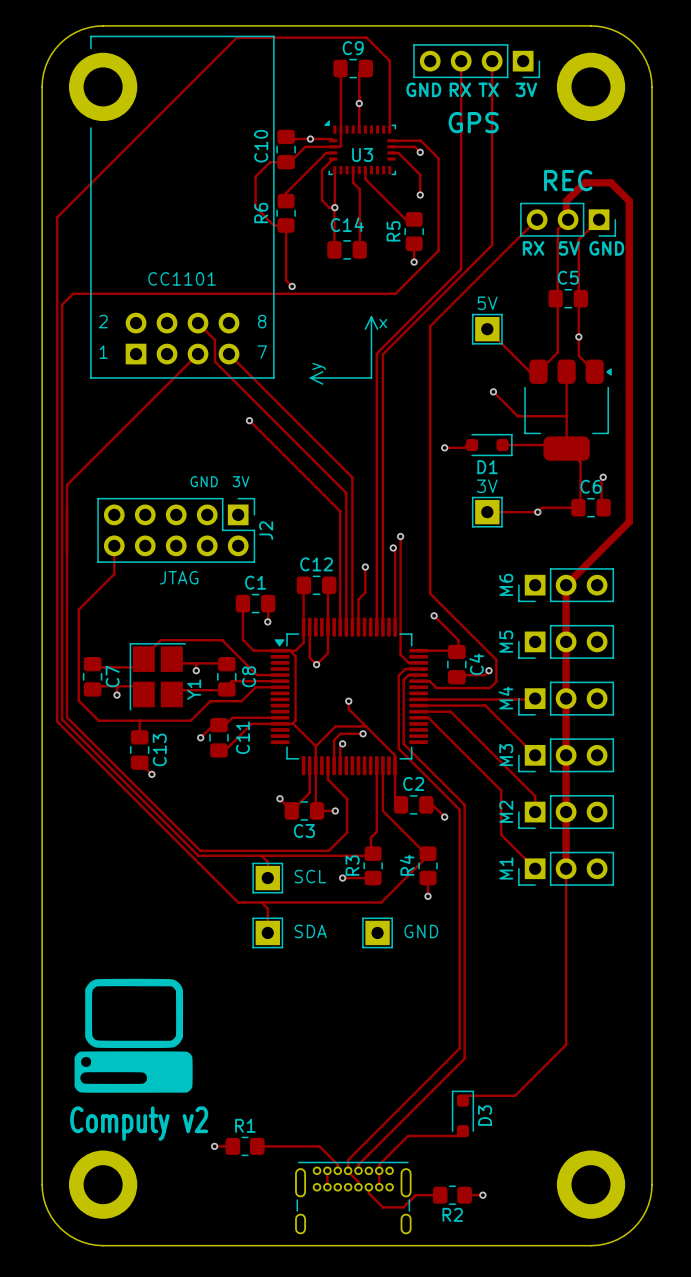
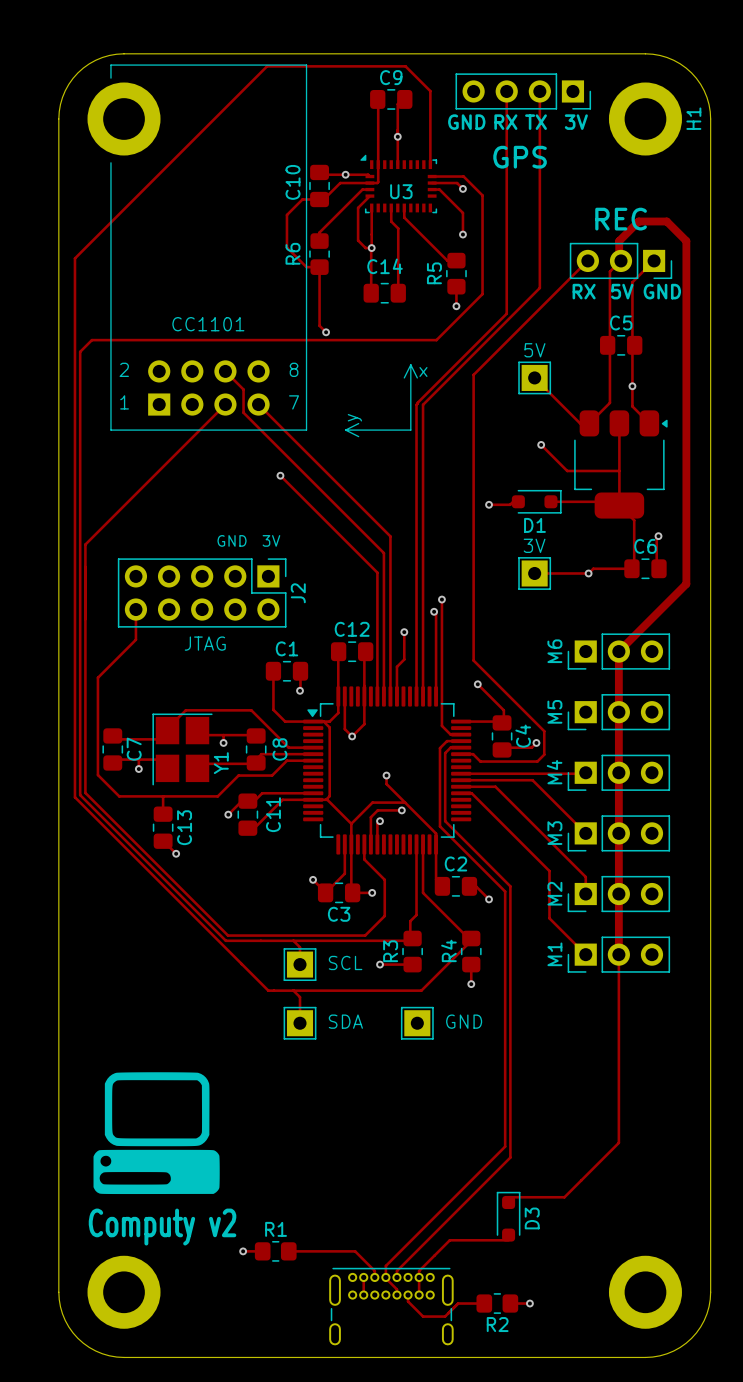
H1 name: none -> H1 (693, 118)

